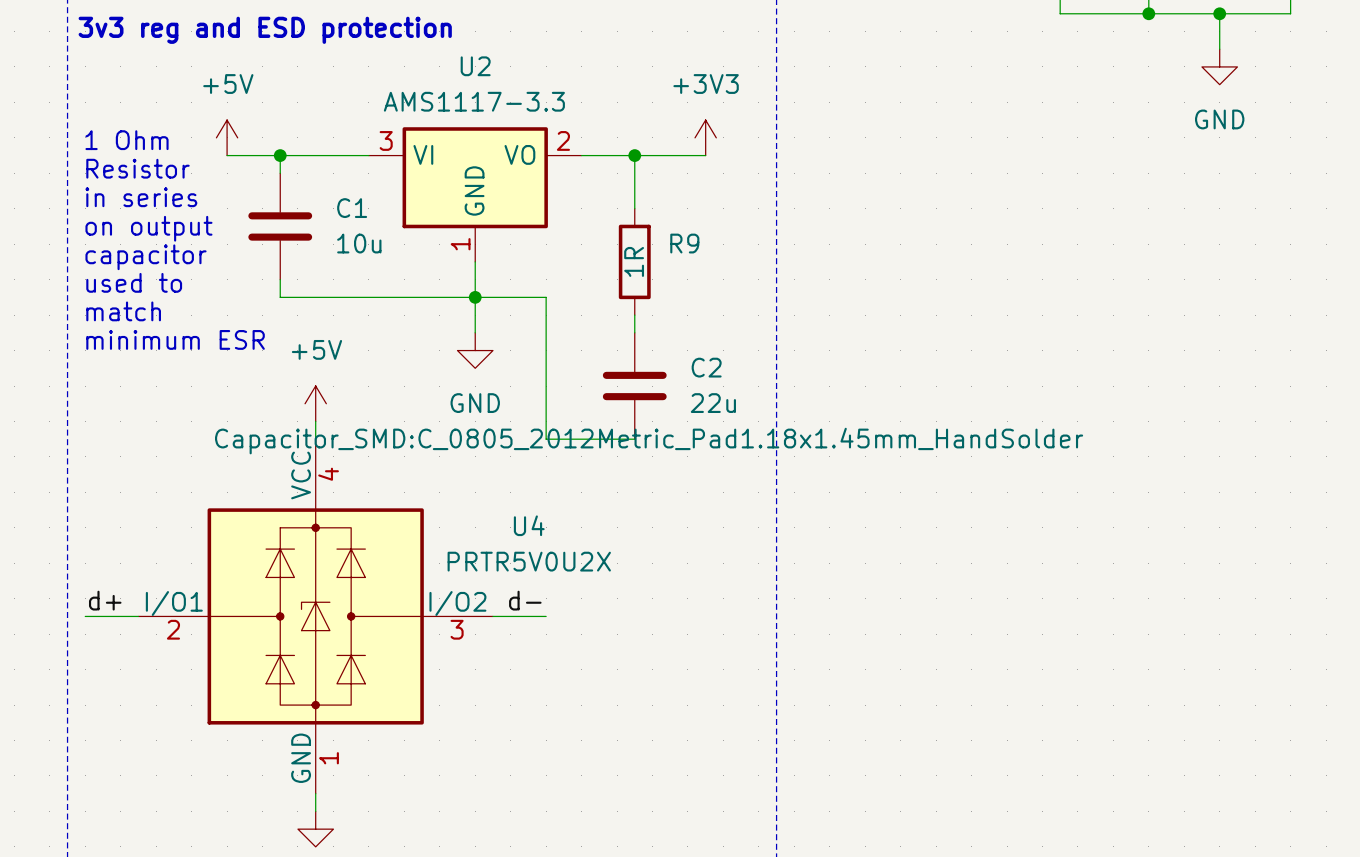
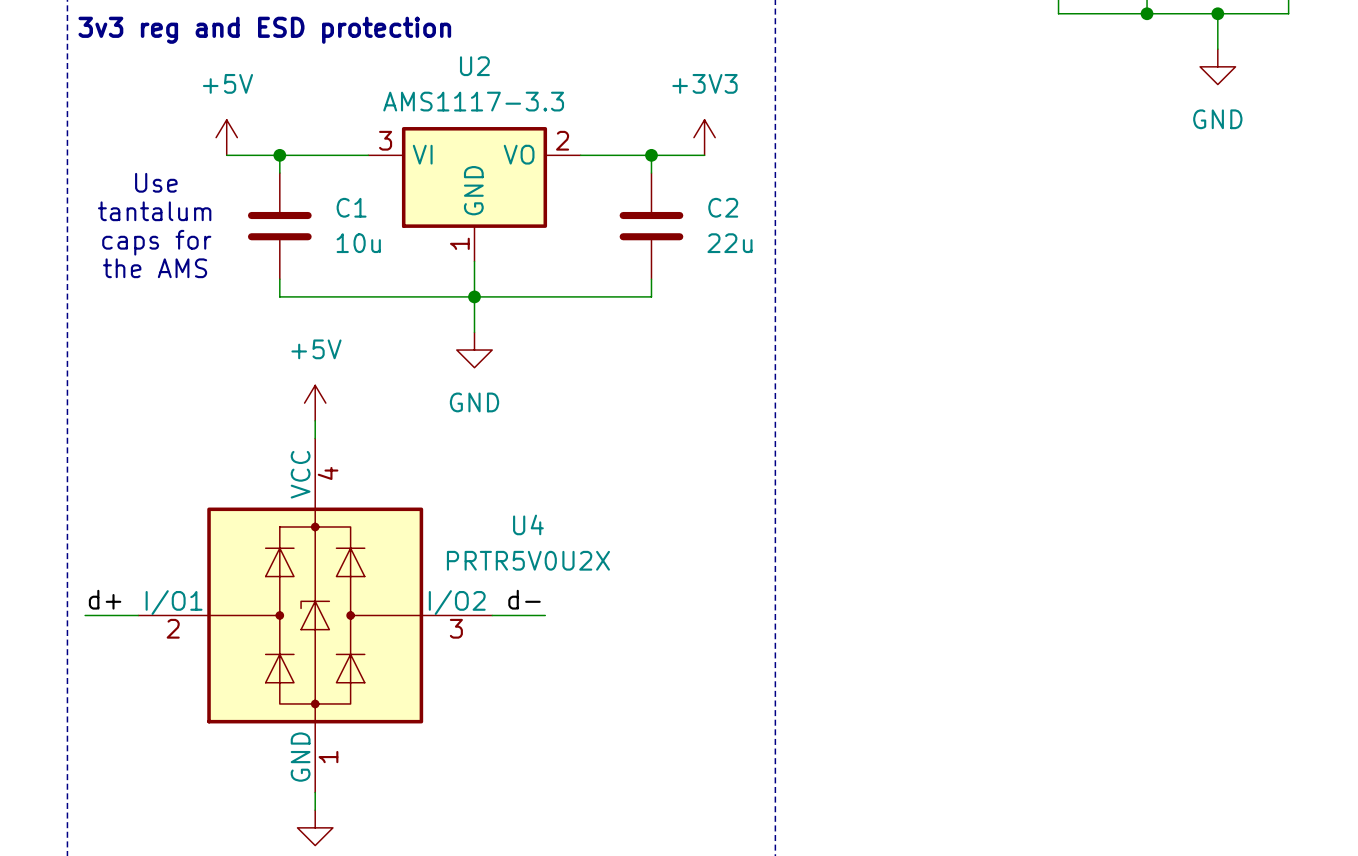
text: 1 Ohm (127, 140) -> none
wire: (634, 155) (634, 208) -> none
junction position: (634, 155) -> (651, 155)
text: Resistor (137, 168) -> none
text: none -> Use (156, 182)
text: in series (141, 197) -> none
text: none -> tantalum (154, 211)
text: on output (148, 228) -> none
text: none -> caps for (156, 242)
text: capacitor (146, 257) -> none
R9: 1R (634, 261) -> none
text: none -> the AMS (155, 268)
text: used to (134, 282) -> none
wire: (546, 297) (546, 439) (634, 439) -> (545, 296) (651, 296) (651, 279)
text: match (123, 311) -> none
wire: (634, 315) (634, 332) -> (651, 155) (651, 173)
text: minimum ESR (175, 339) -> none
C2 position: (634, 386) -> (651, 226)
C2 text: Capacitor_SMD:C_0805_2012Metric_Pad1.18x1.45mm_HandSolder (649, 441) -> none

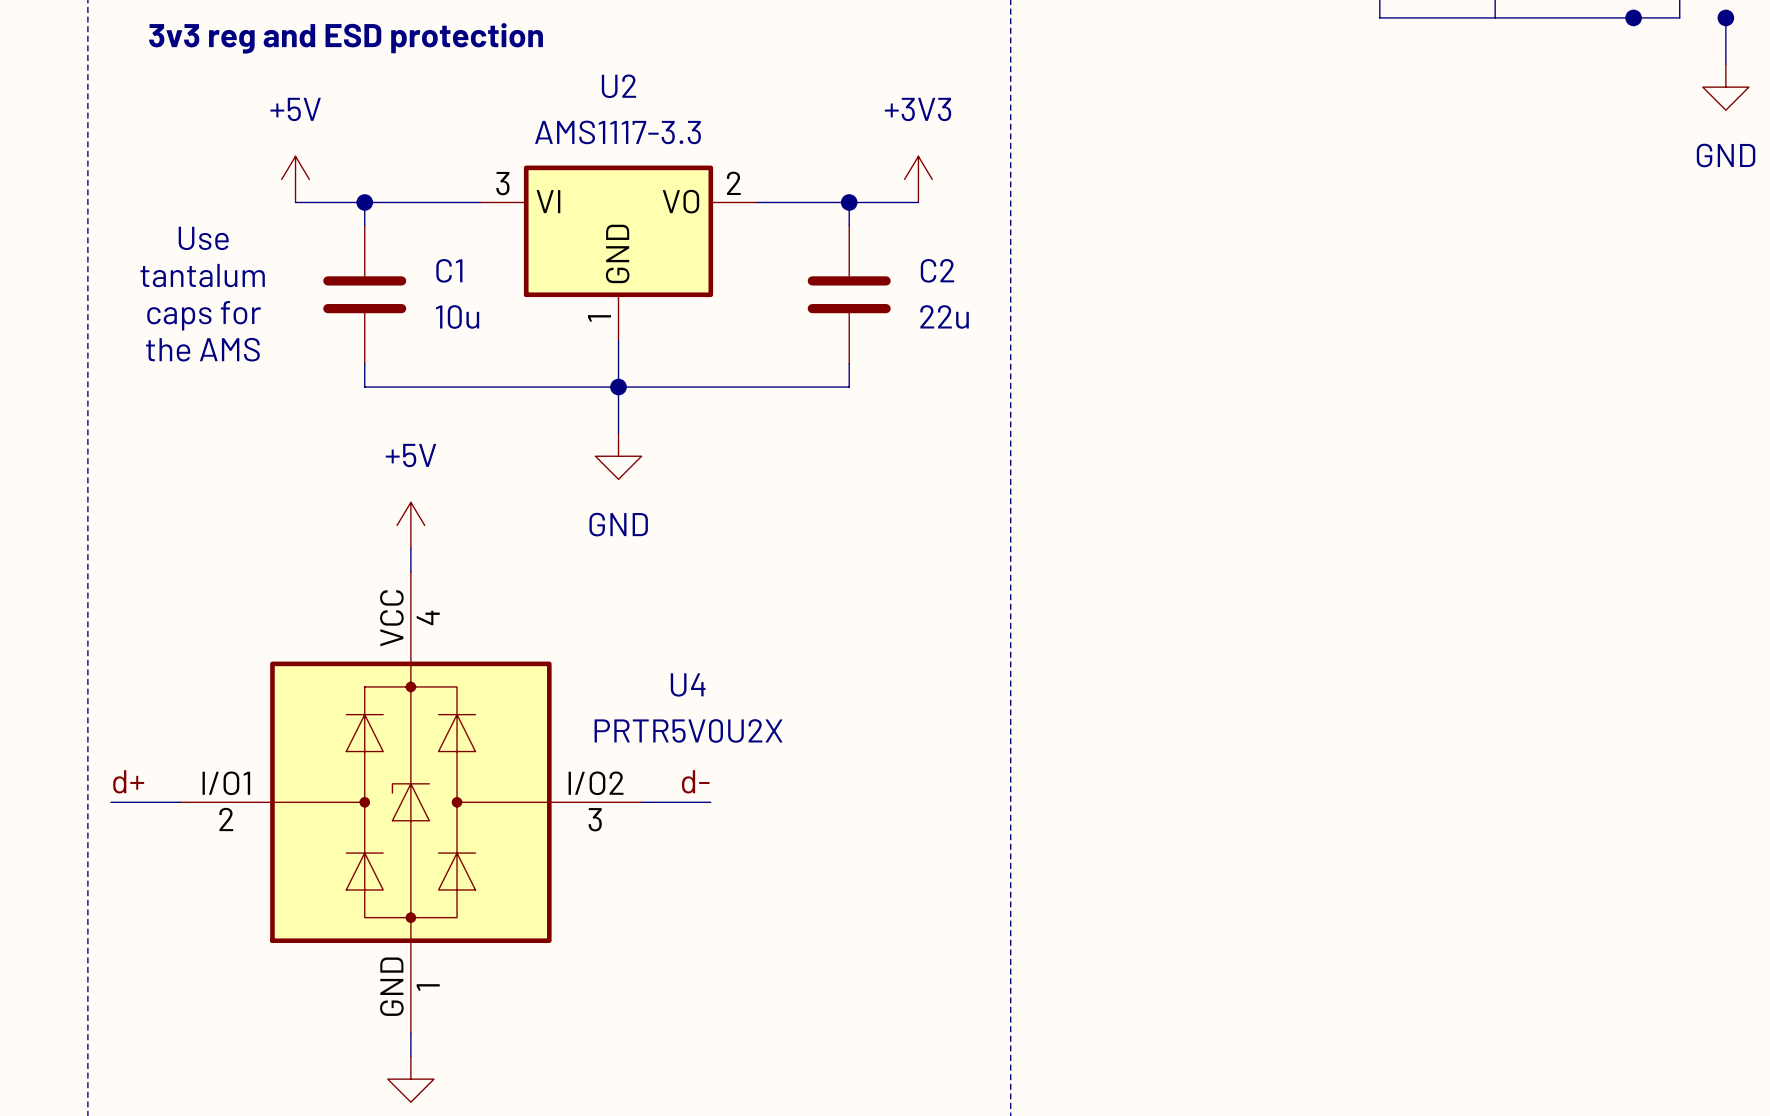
junction: (1147, 13) -> none
wire: (1217, 13) (1217, 49) -> (1725, 17) (1725, 64)
junction position: (1217, 13) -> (1633, 17)
junction: none -> (1725, 17)
power symbol position: GND (1217, 66) -> GND (1725, 87)

